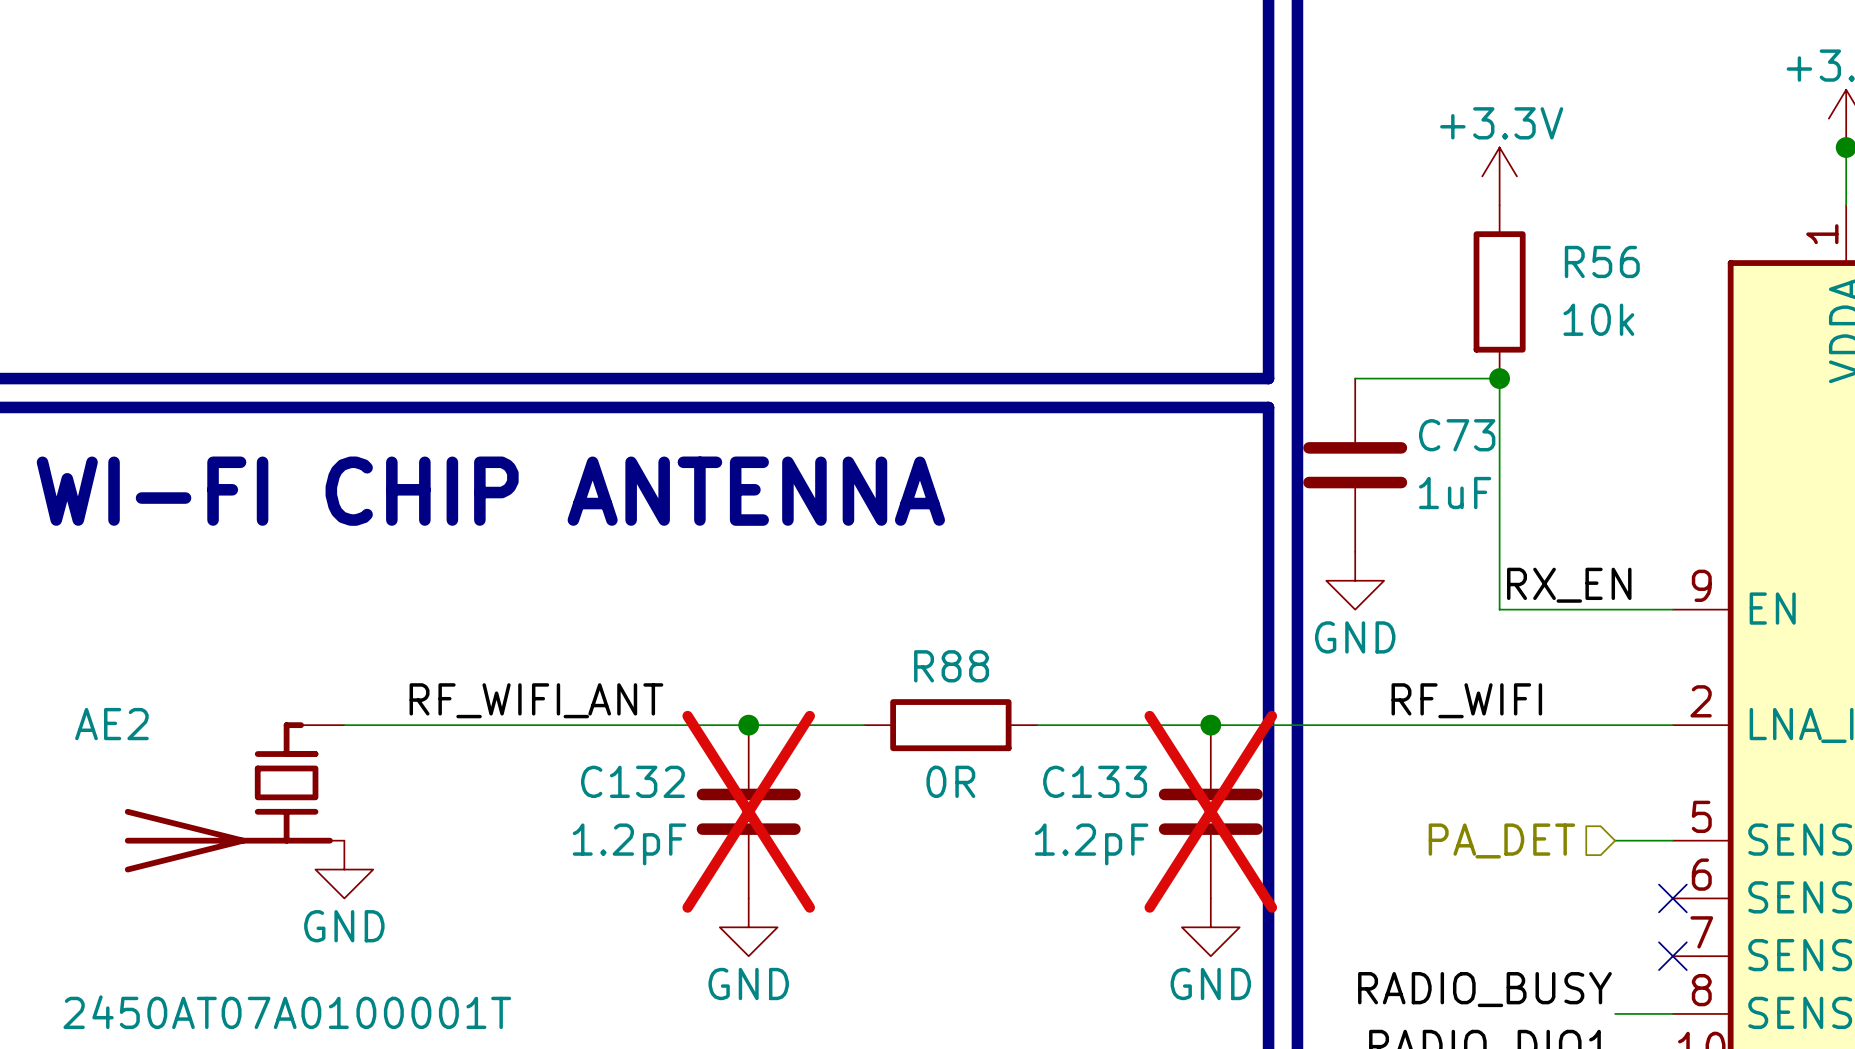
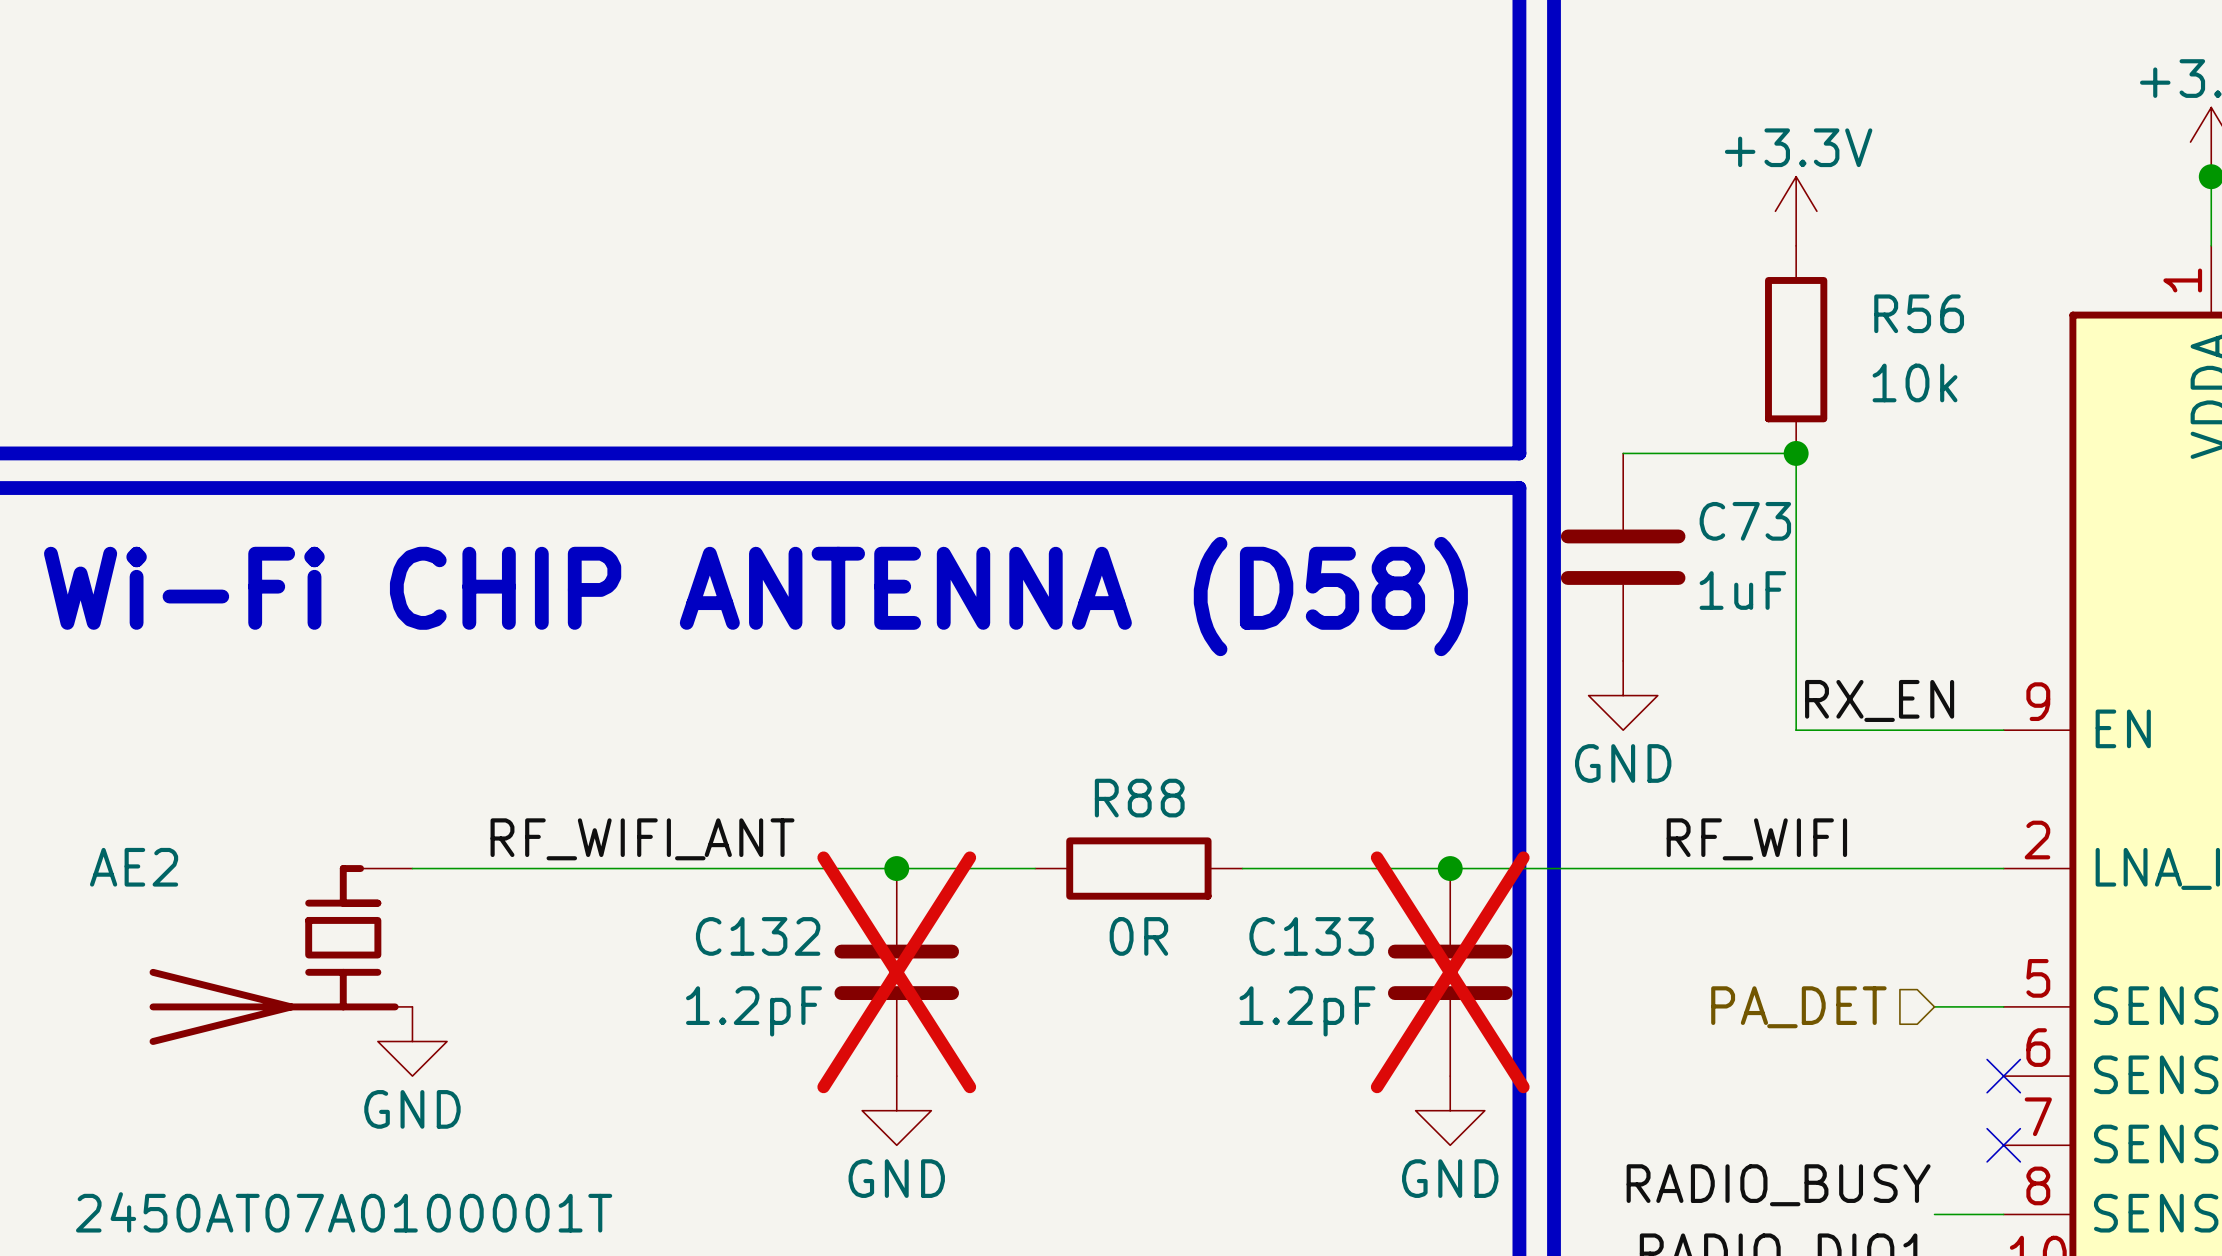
text: WI-FI CHIP ANTENNA (490, 491) -> Wi-Fi CHIP ANTENNA (D58) (755, 596)

